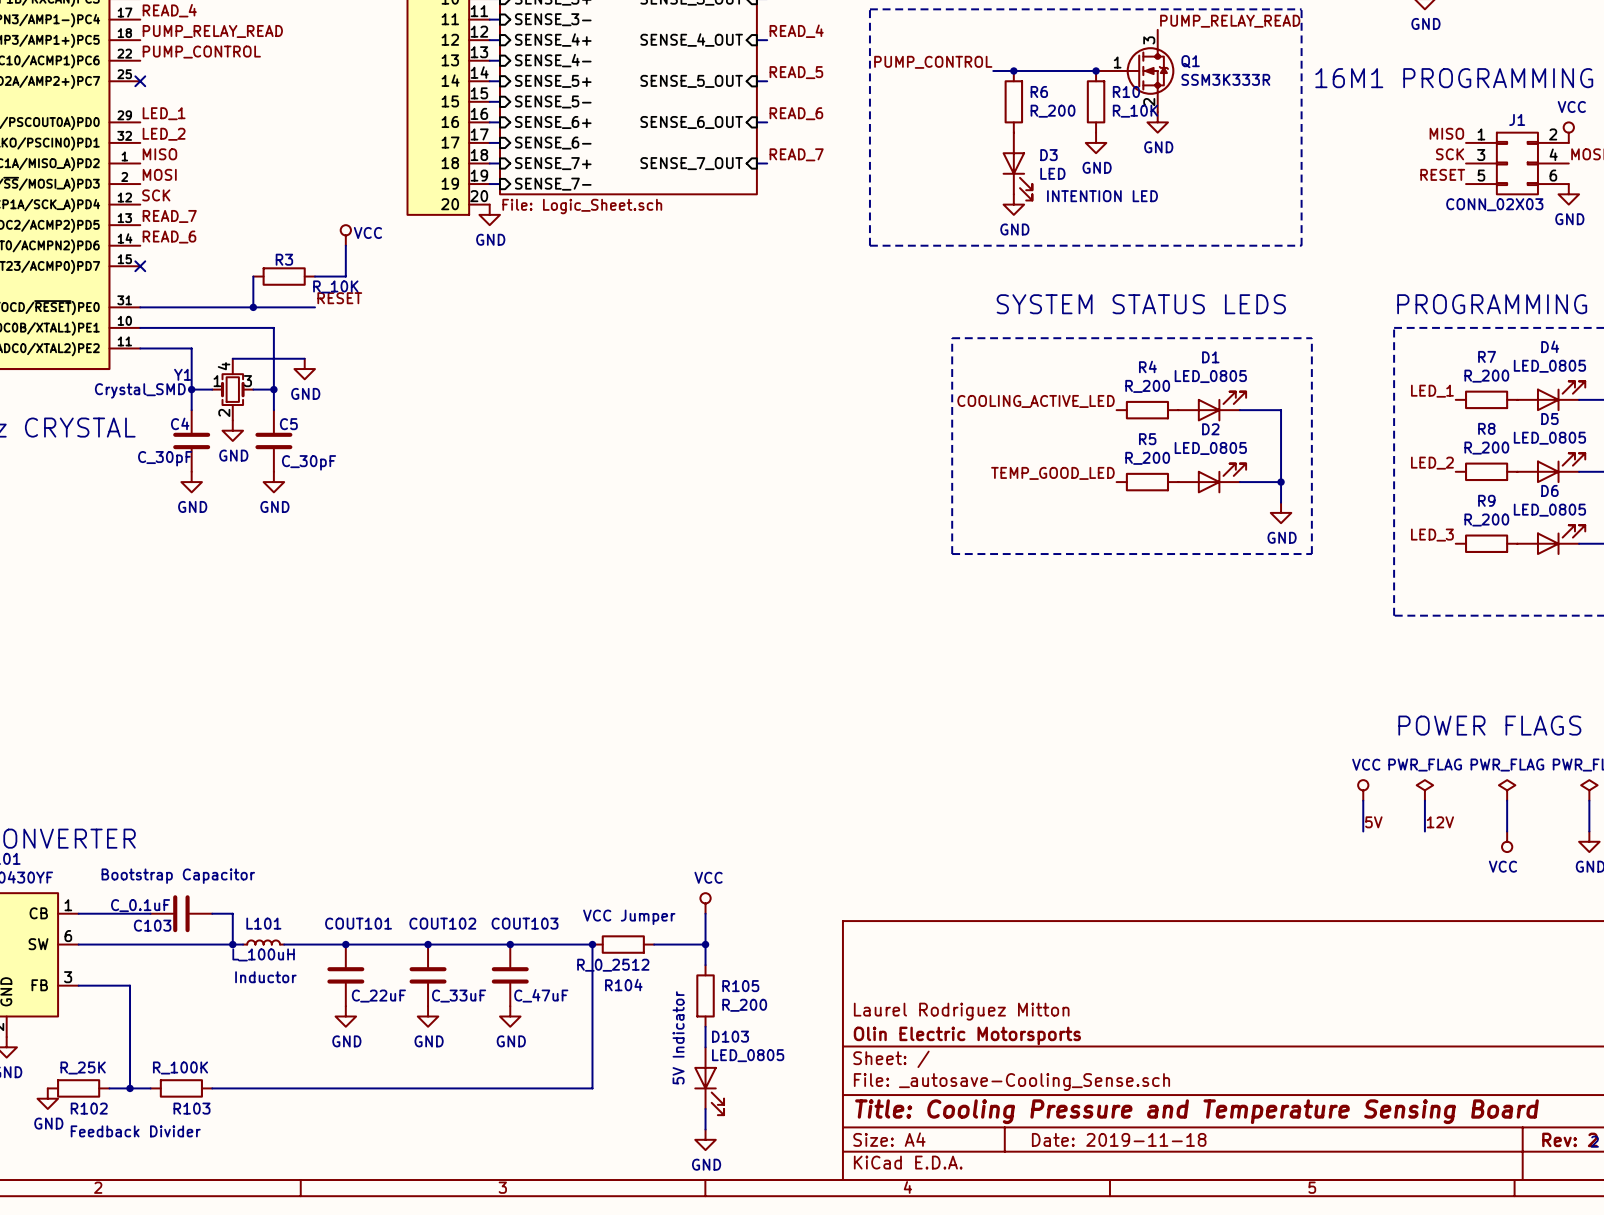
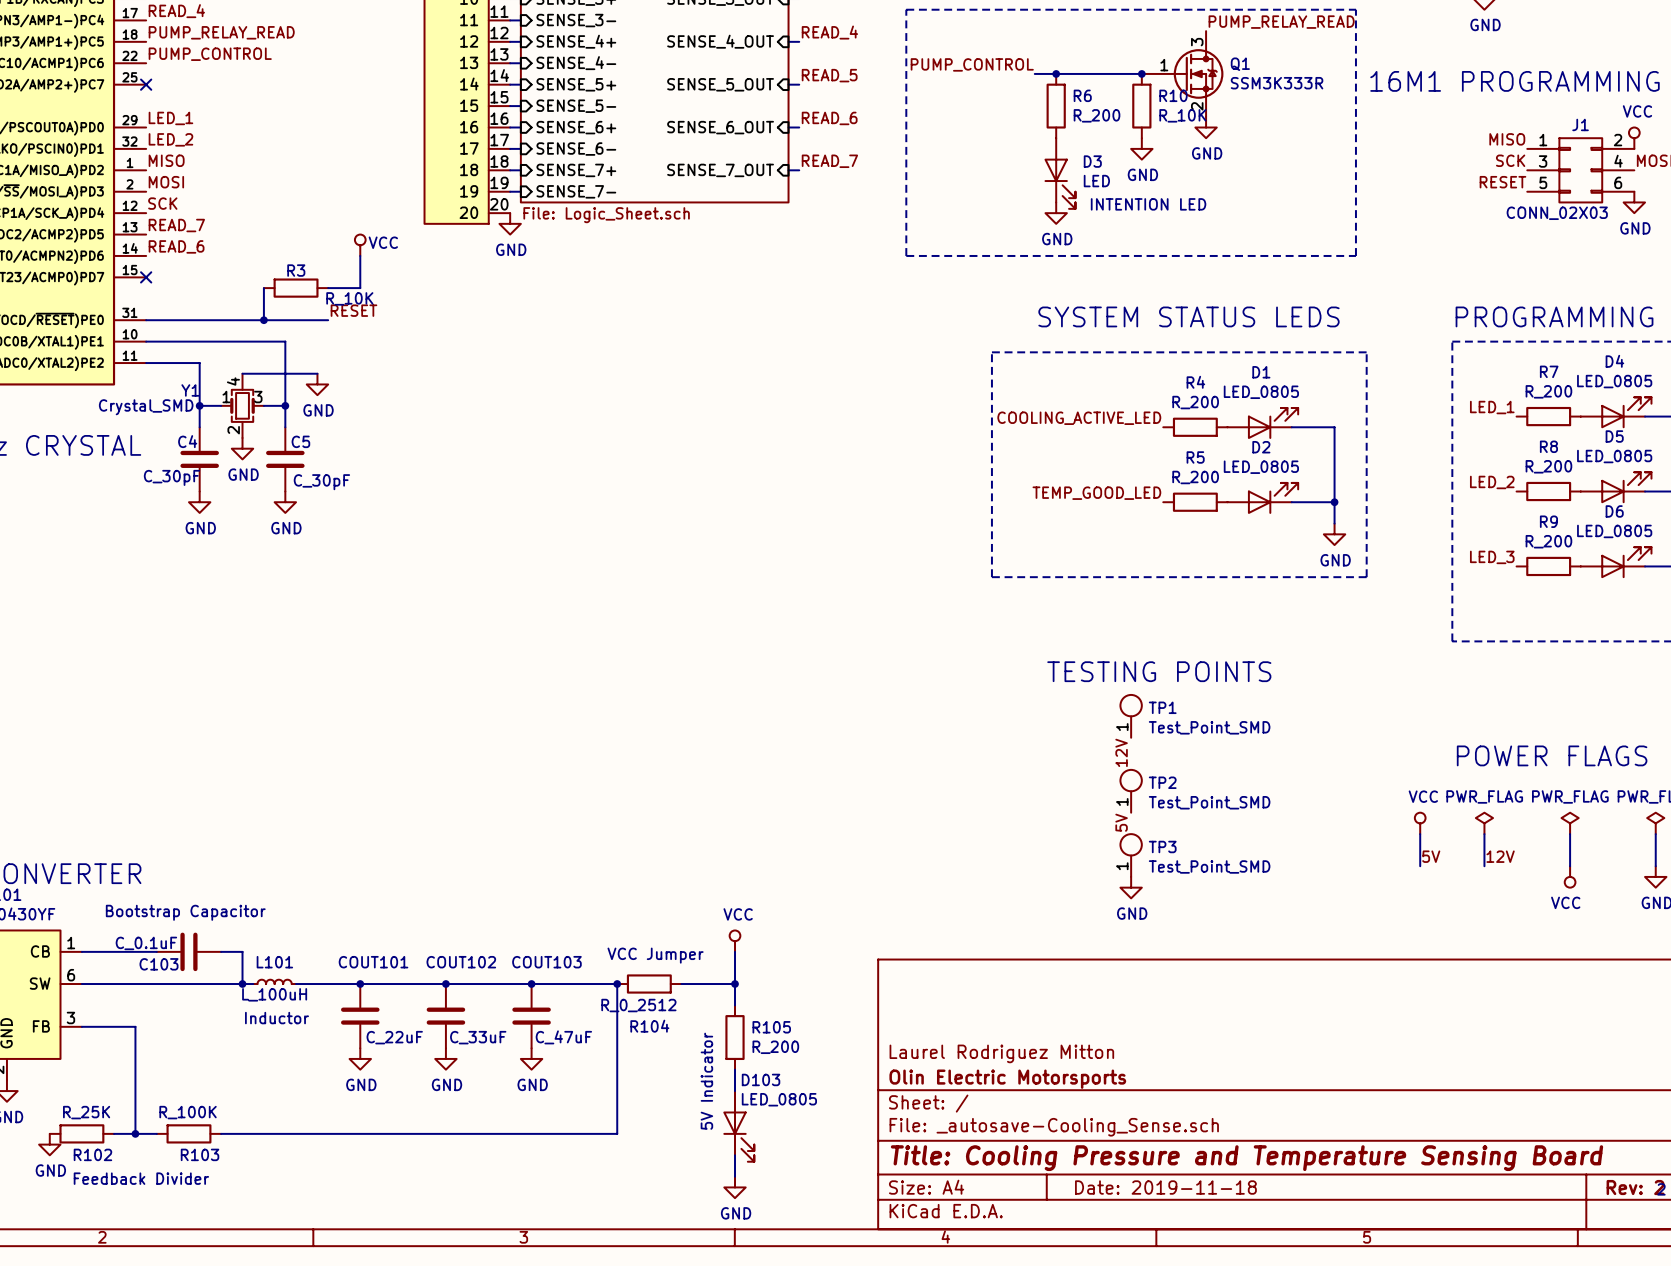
text: none -> TESTING POINTS (1159, 671)
TP1: none -> Test_Point_SMD (1131, 716)
label: none -> 12V (1121, 752)
TP2: none -> Test_Point_SMD (1131, 791)
label: none -> 5V (1121, 822)
TP3: none -> Test_Point_SMD (1131, 855)
power symbol: none -> GND (1131, 887)

